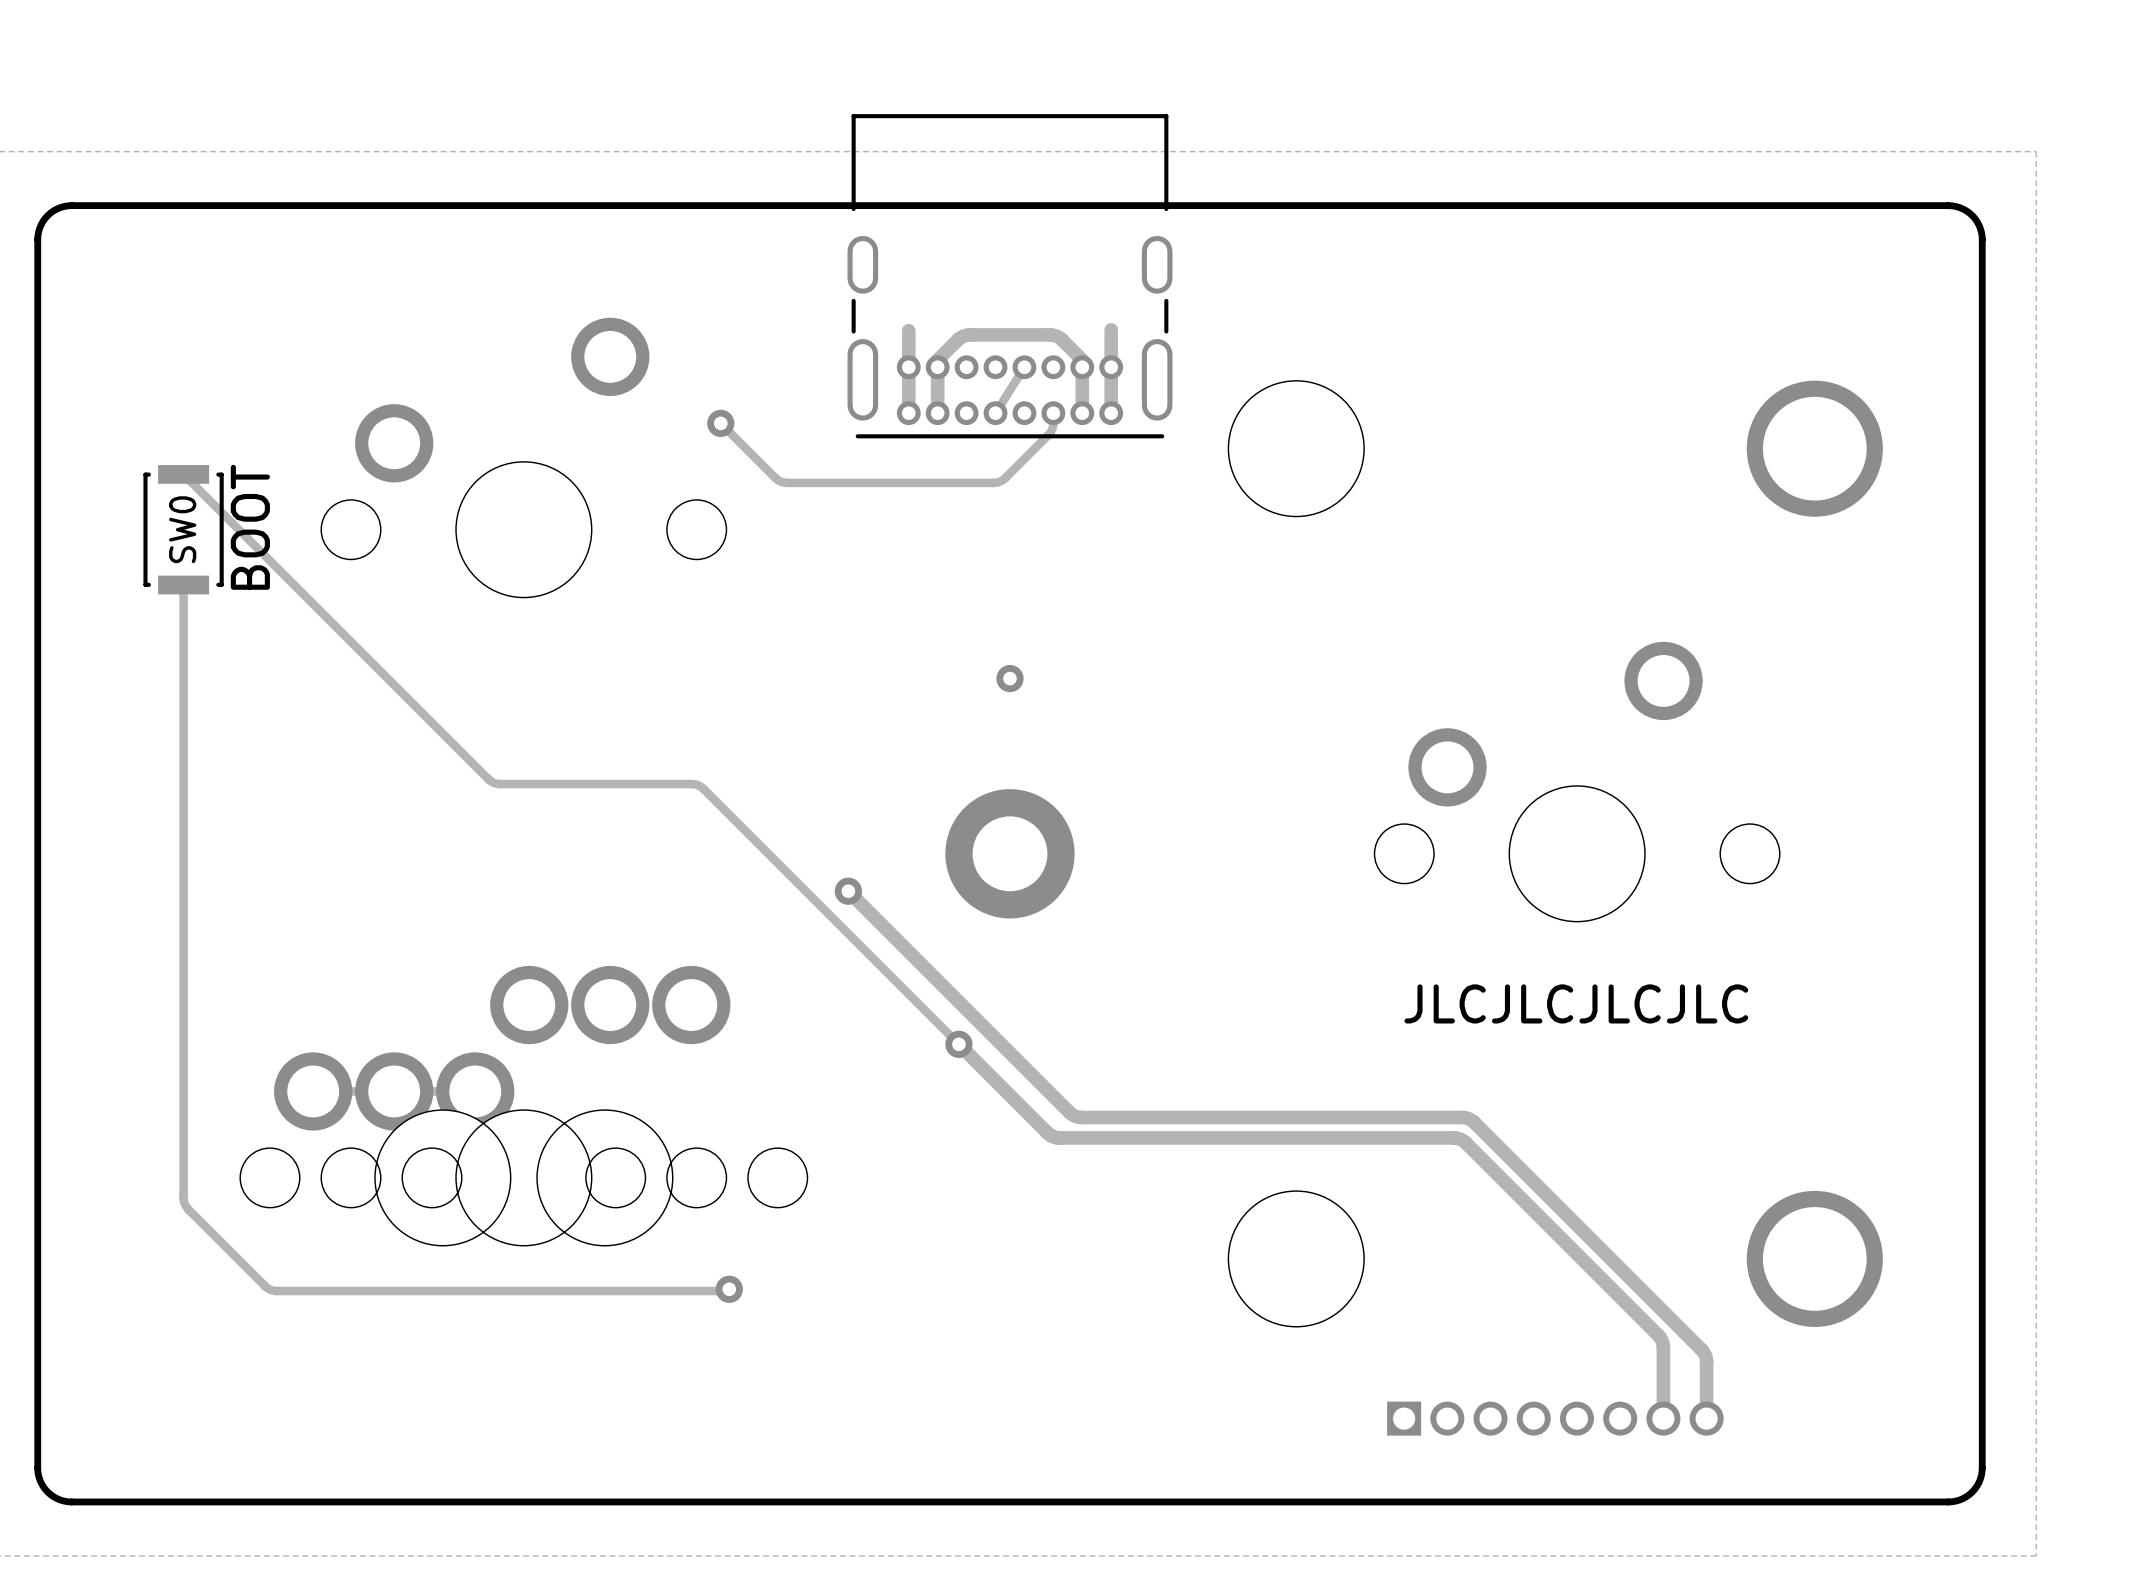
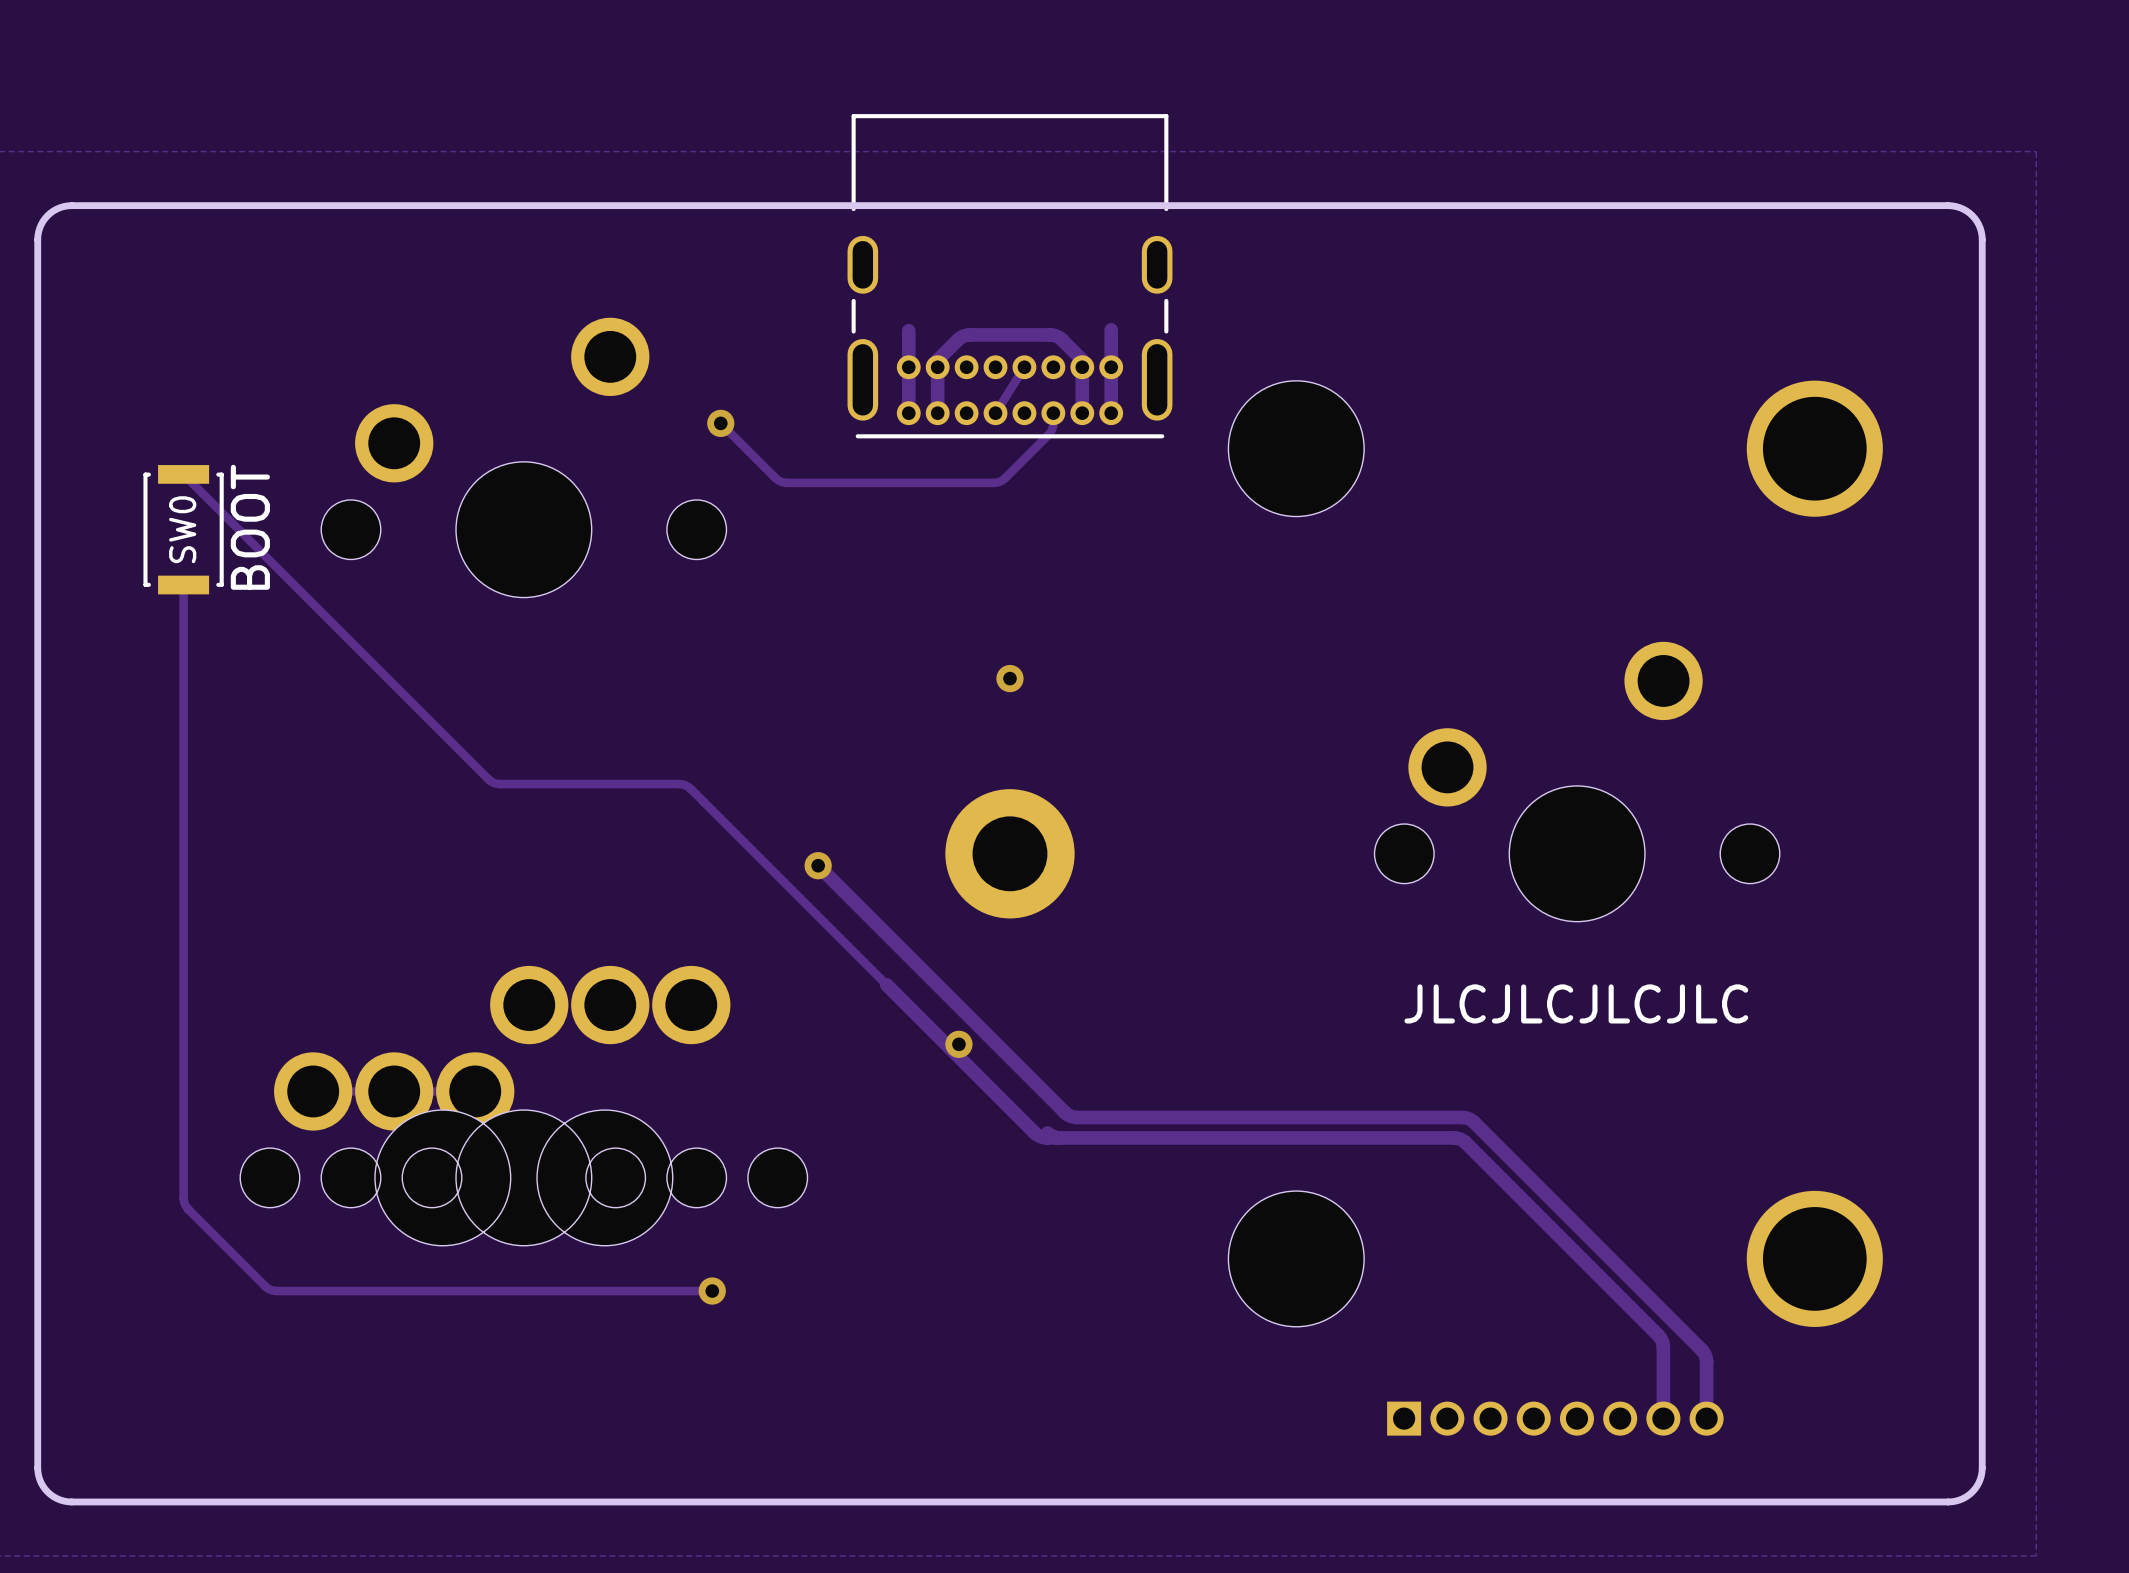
track: (678, 784) (696, 784) (703, 789) (1047, 1132) -> (678, 784) (690, 789) (1034, 1132) (1043, 1137) (1059, 1137)
track: (848, 891) (1069, 1112) (1081, 1117) -> (818, 865) (1064, 1112) (1072, 1116) (1081, 1117)
via position: (848, 891) -> (818, 865)
via position: (729, 1289) -> (712, 1291)

